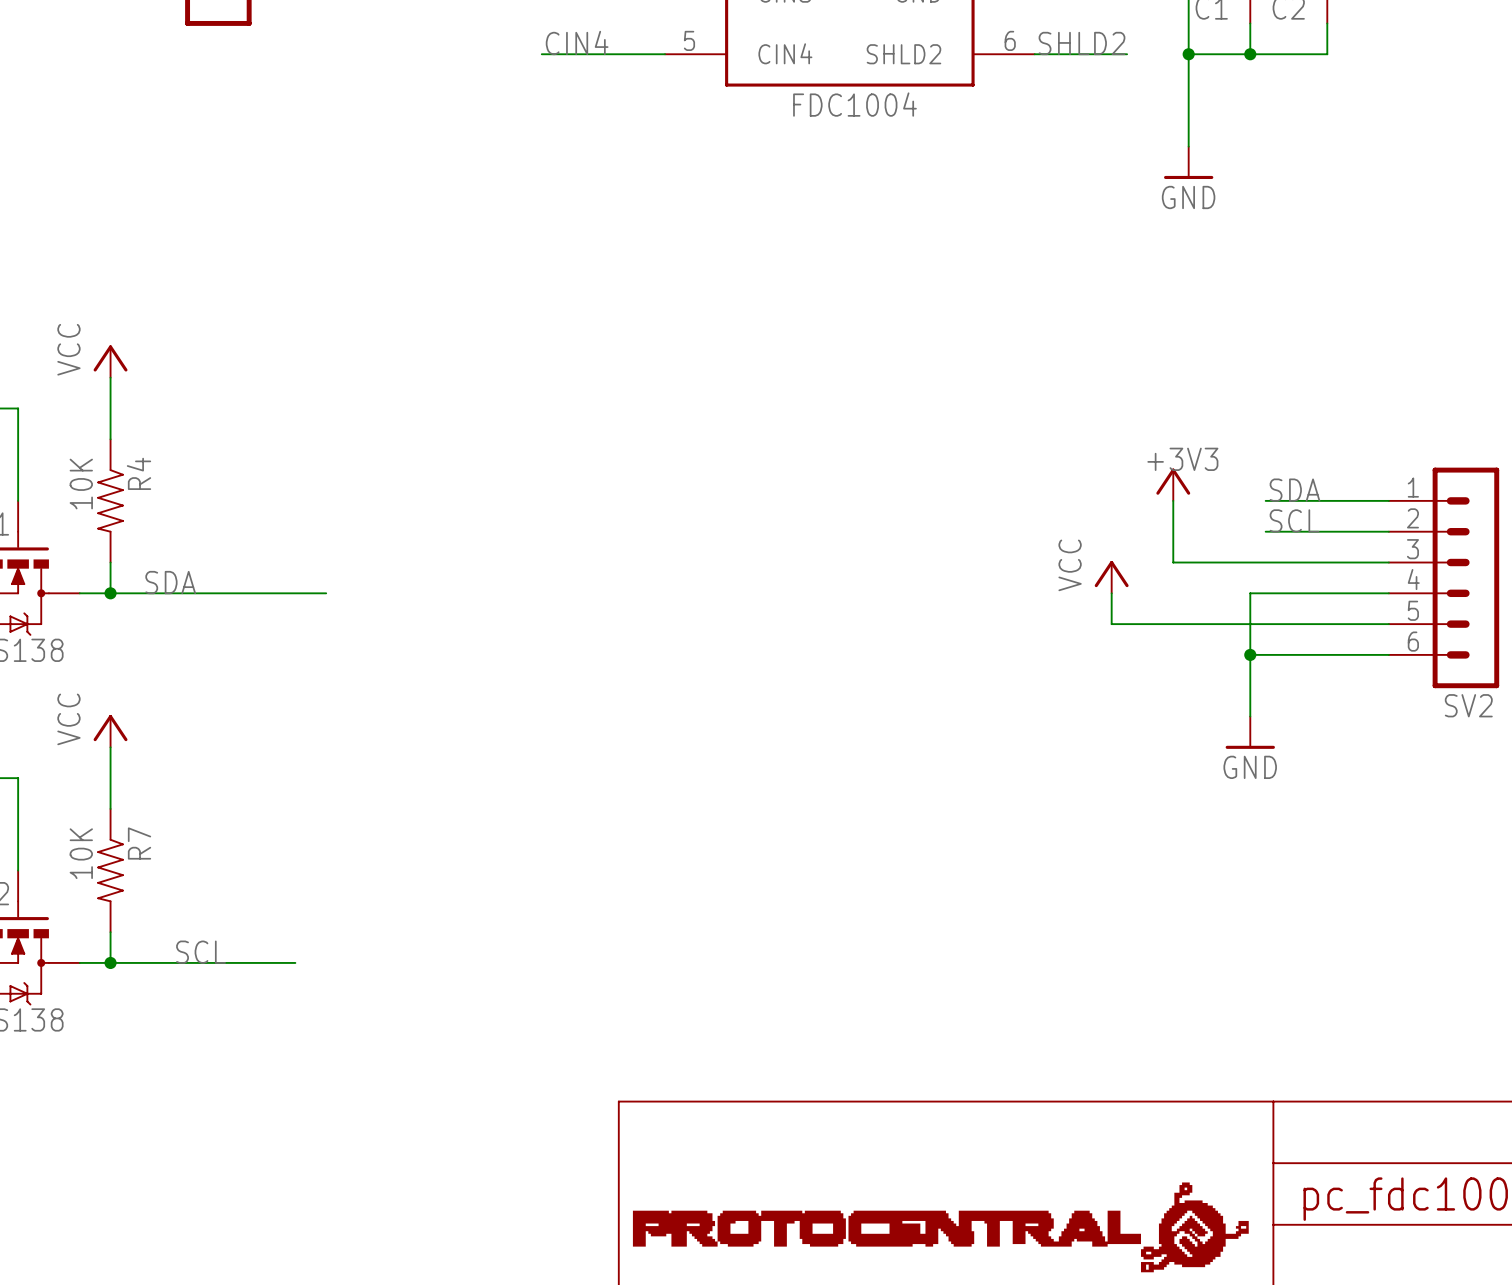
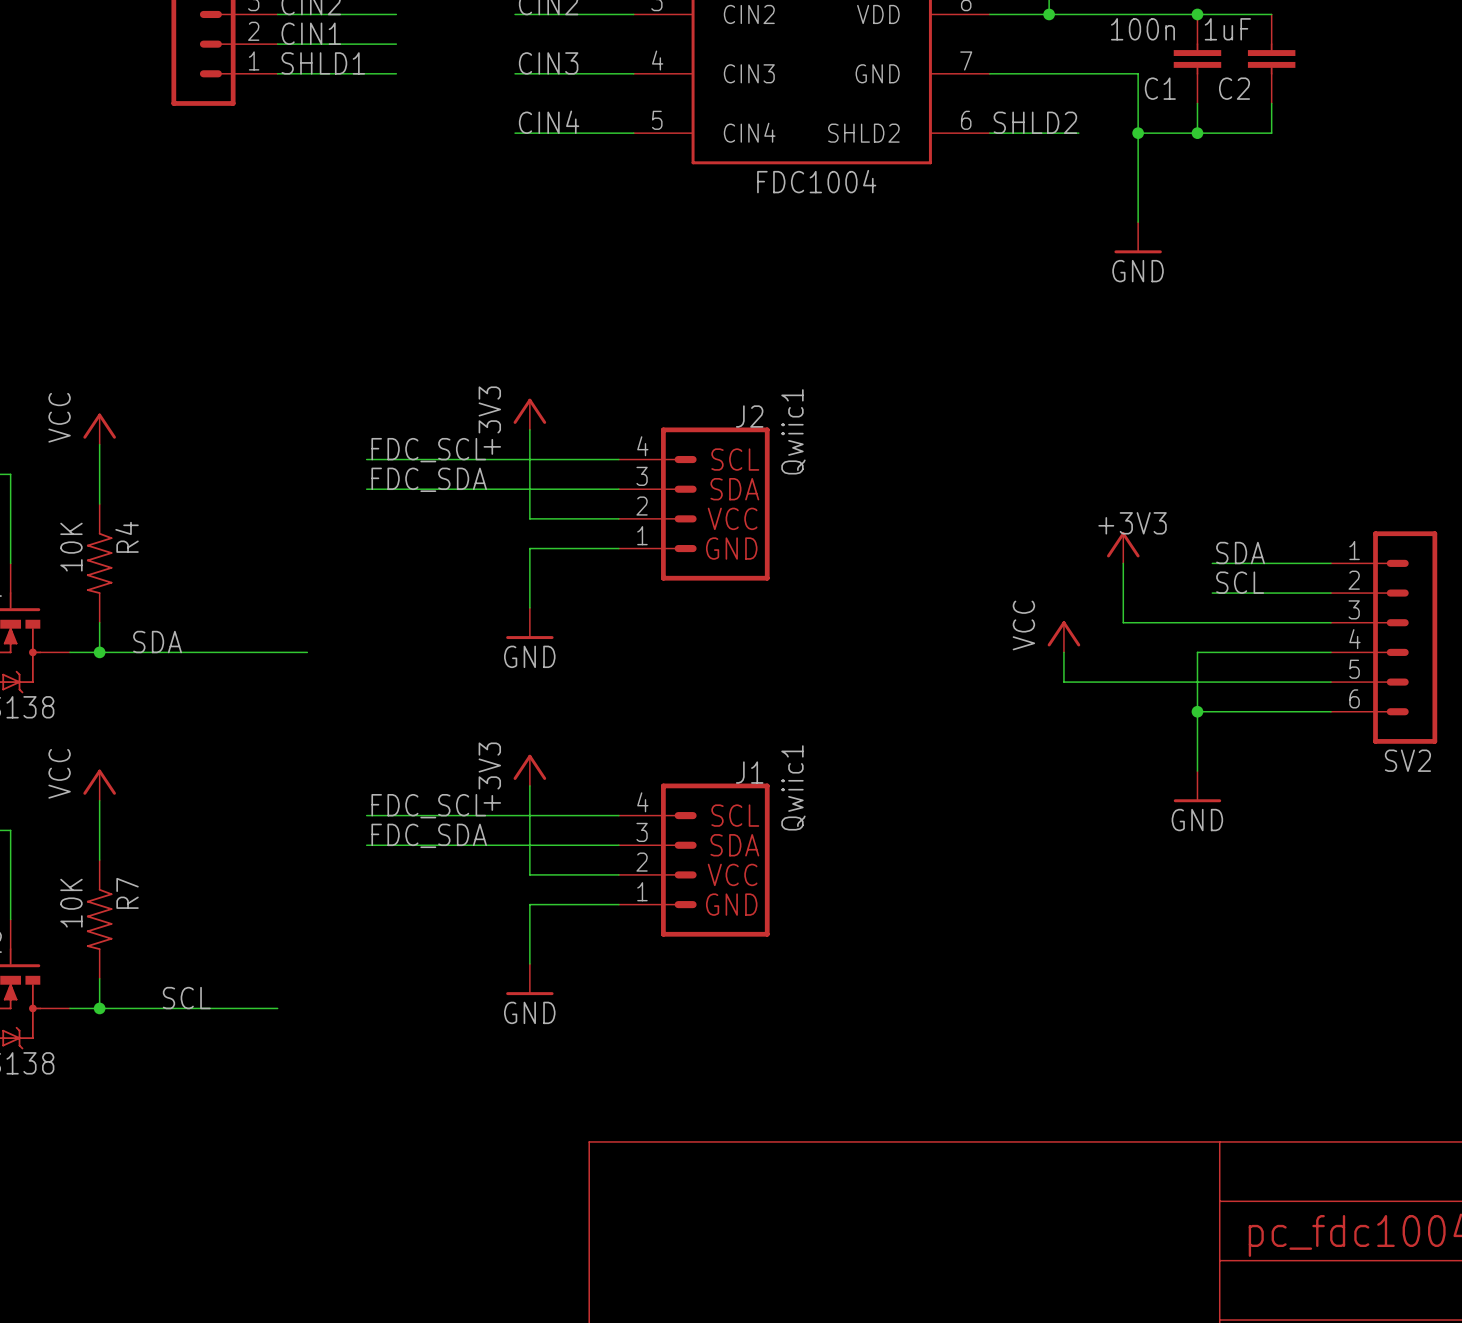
power symbol: none -> +3V3 (529, 414)
wire: none -> (529, 429) (529, 518) (618, 518)
label: none -> FDC_SCL (428, 450)
wire: none -> (366, 459) (618, 459)
label: none -> FDC_SDA (429, 479)
wire: none -> (366, 489) (618, 489)
J2: none -> Qwiic1 (694, 504)
wire: none -> (618, 548) (529, 548) (529, 607)
power symbol: none -> GND (529, 623)
power symbol: none -> +3V3 (529, 770)
wire: none -> (529, 785) (529, 874) (618, 874)
label: none -> FDC_SCL (428, 806)
wire: none -> (366, 815) (618, 815)
label: none -> FDC_SDA (429, 835)
wire: none -> (366, 845) (618, 845)
J1: none -> Qwiic1 (694, 860)
wire: none -> (618, 904) (529, 904) (529, 963)
power symbol: none -> GND (529, 979)
part: (940, 1227) -> none

